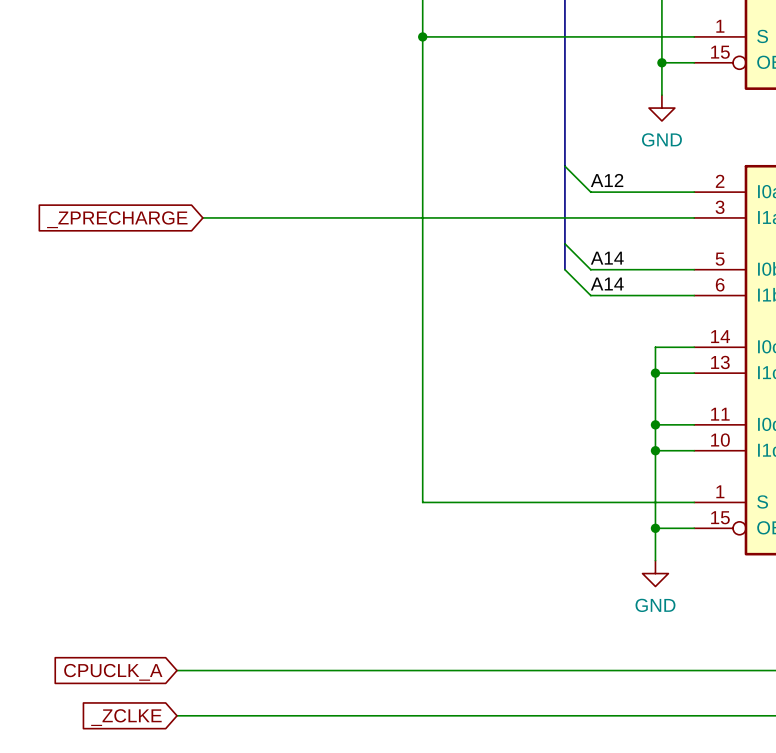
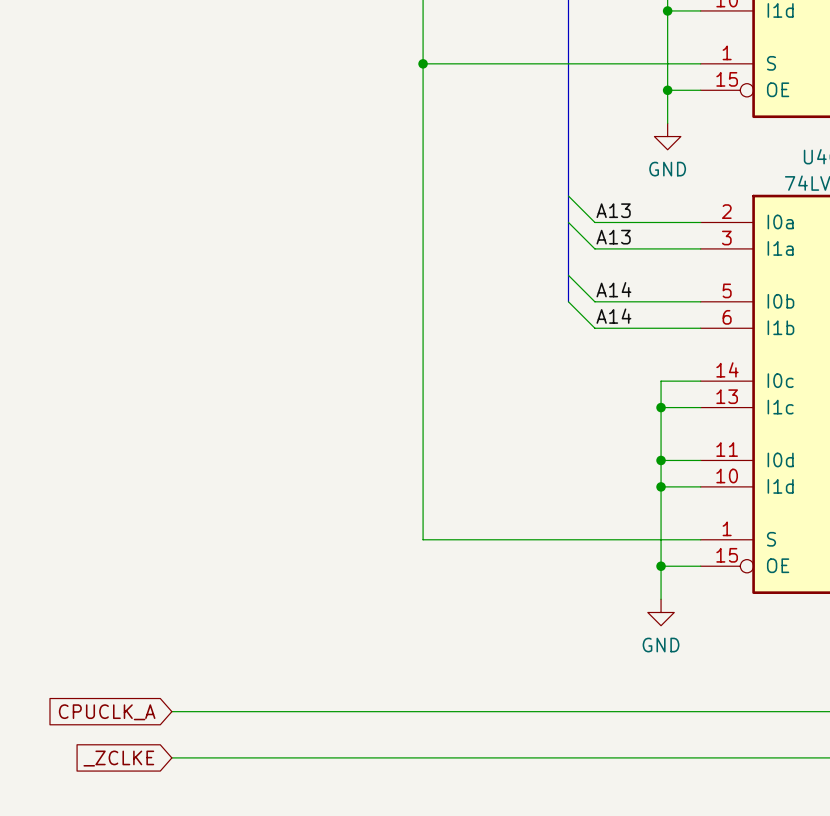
label: A12 (607, 180) -> A13 (613, 210)
label: none -> A13 (613, 237)
wire: (202, 217) (590, 217) -> (568, 222) (594, 248)
global label: _ZPRECHARGE (117, 219) -> none

